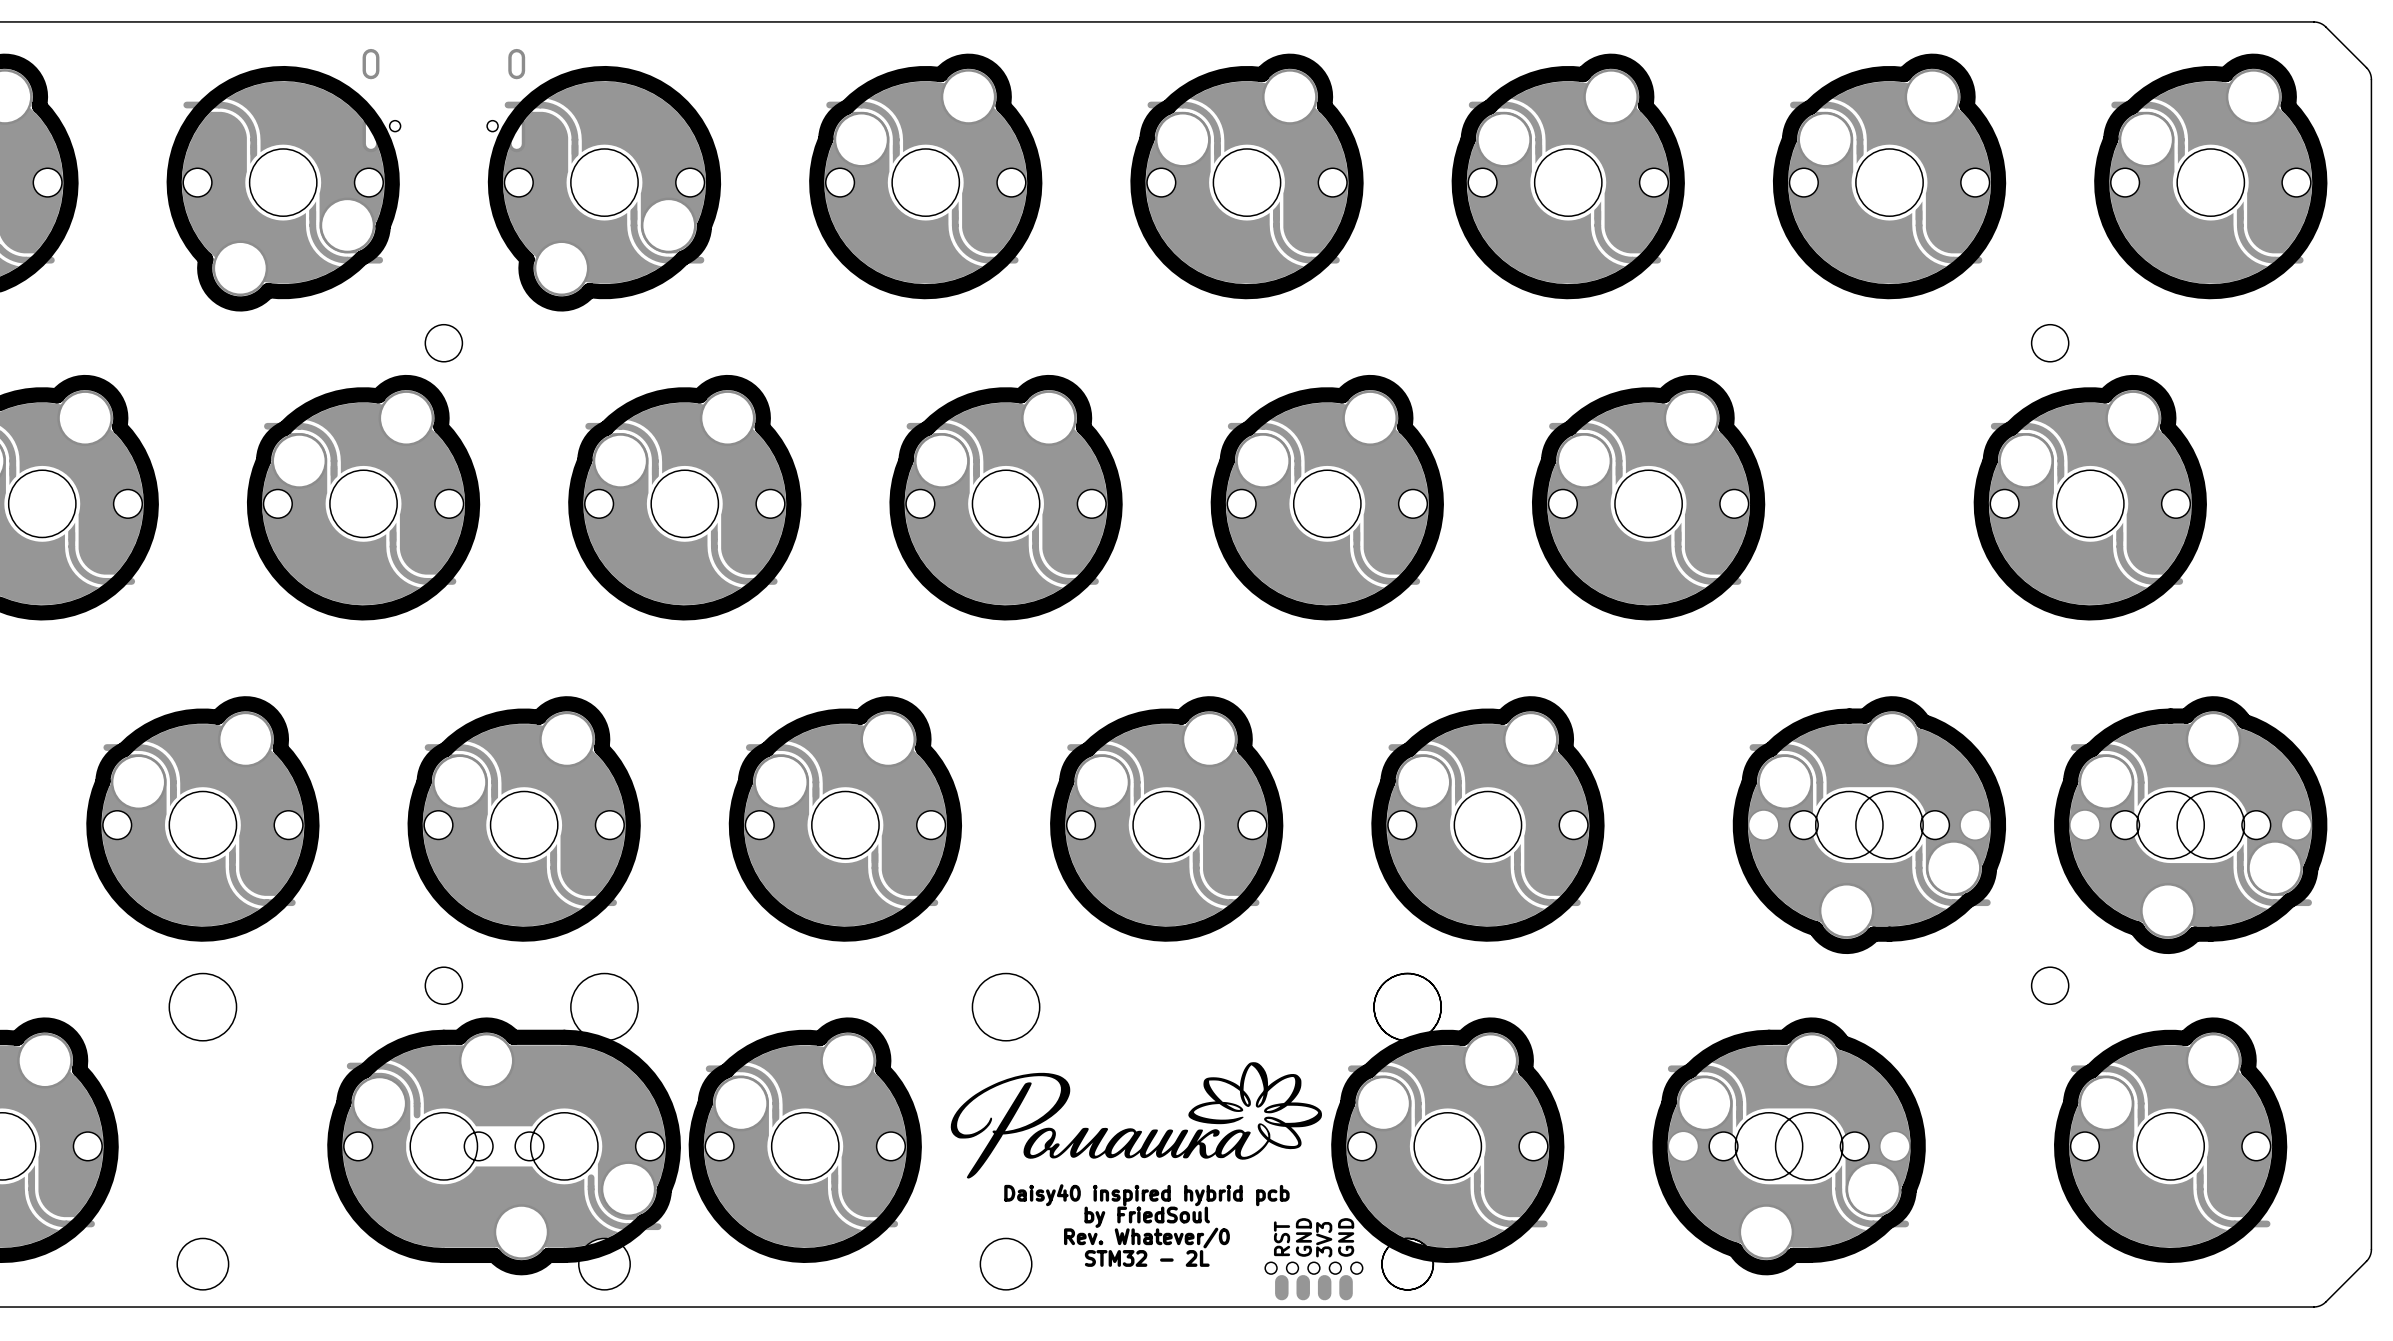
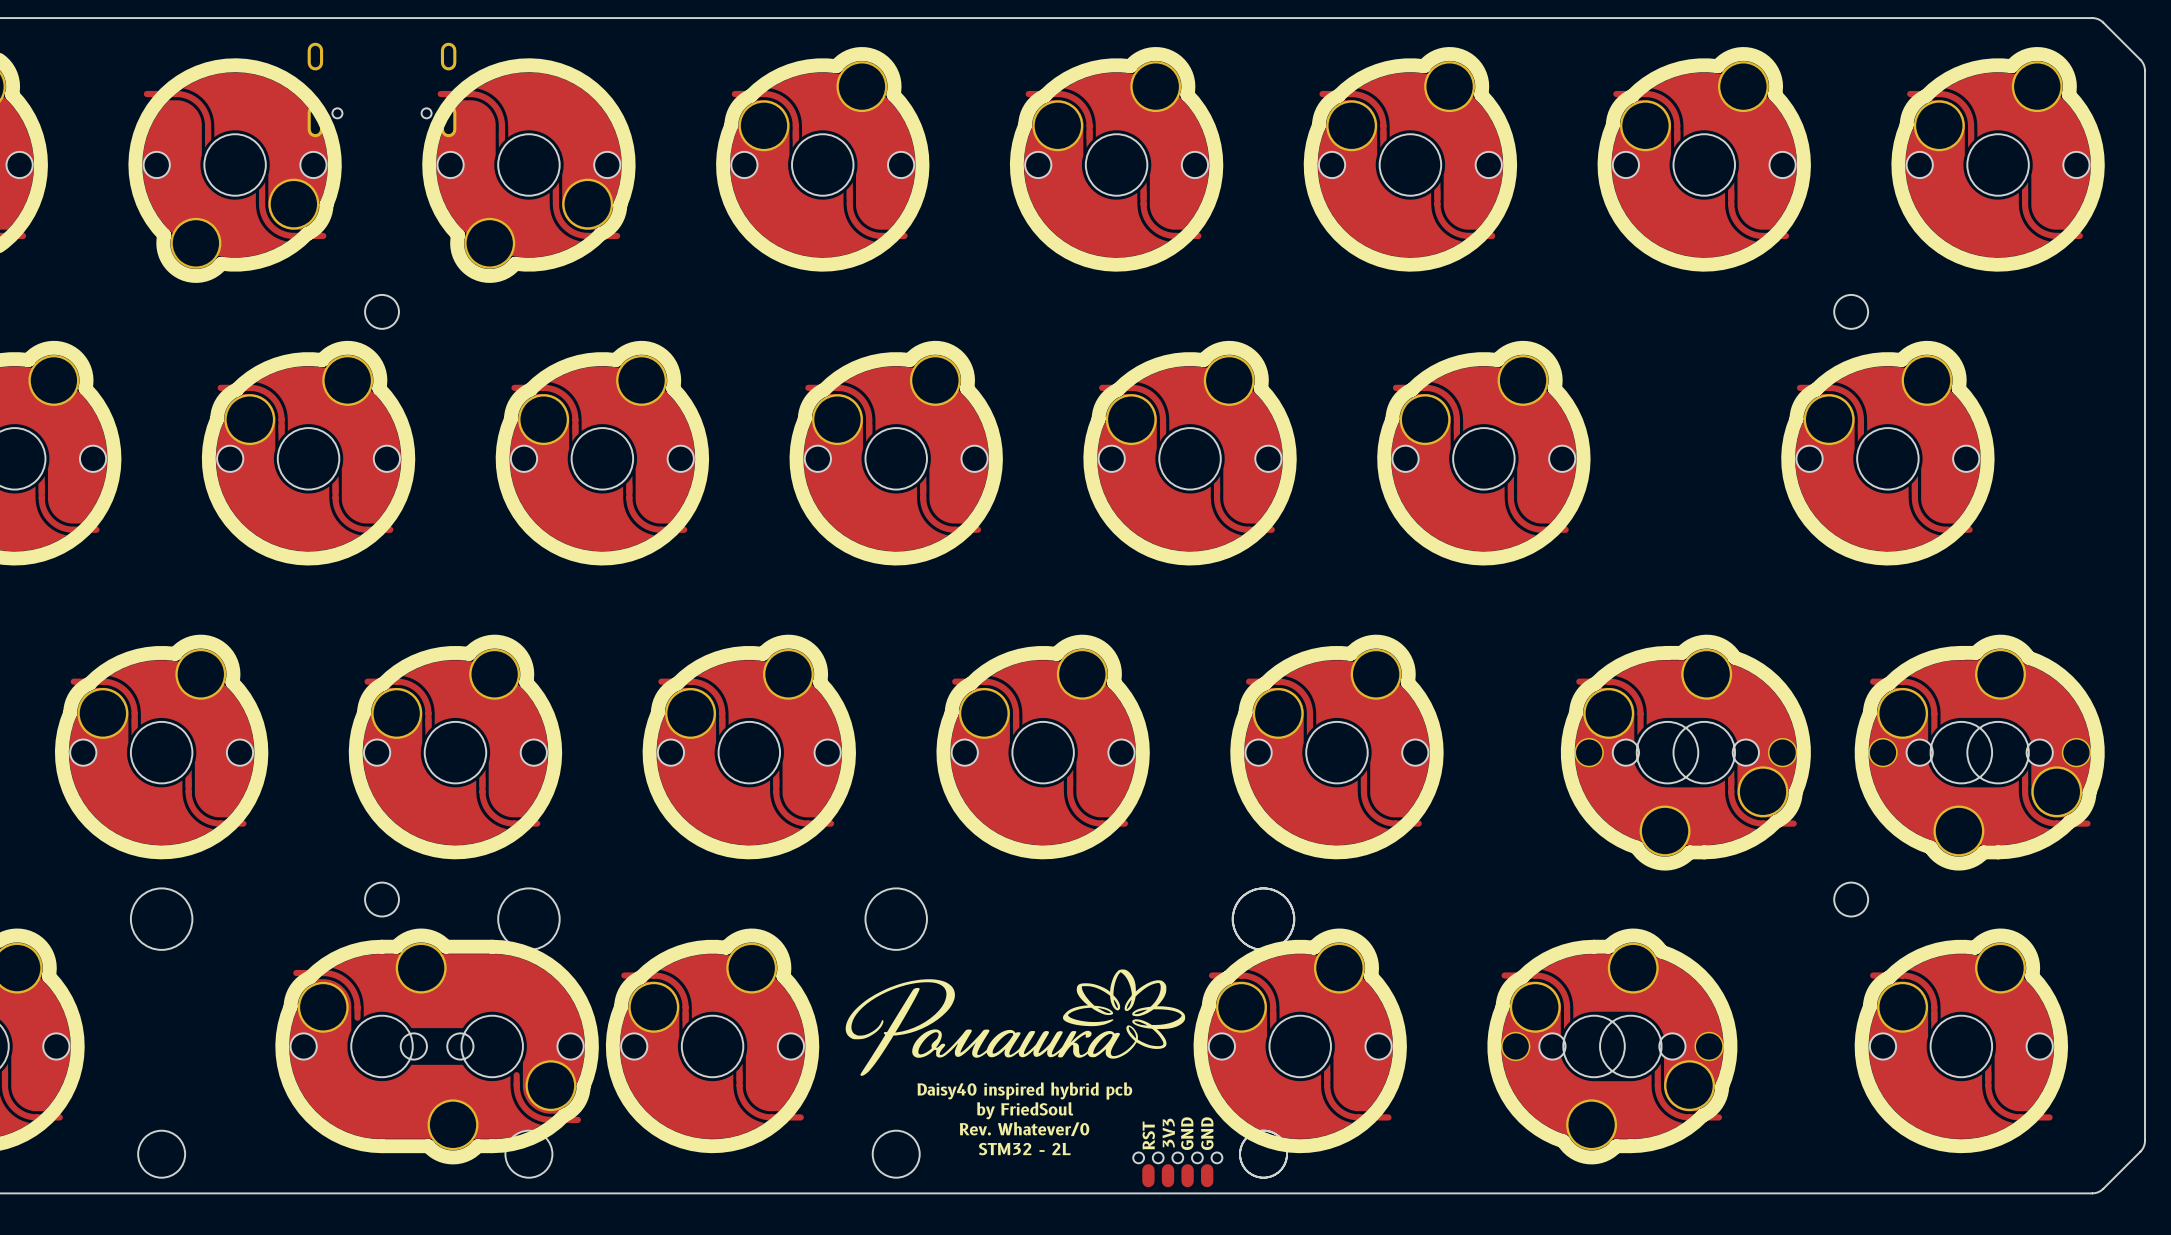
part footprint: [688, 1017, 922, 1264] -> [605, 928, 820, 1154]
text: GND (1303, 1237) -> 3V3 (1168, 1133)
text: 3V3 (1324, 1239) -> GND (1187, 1133)

